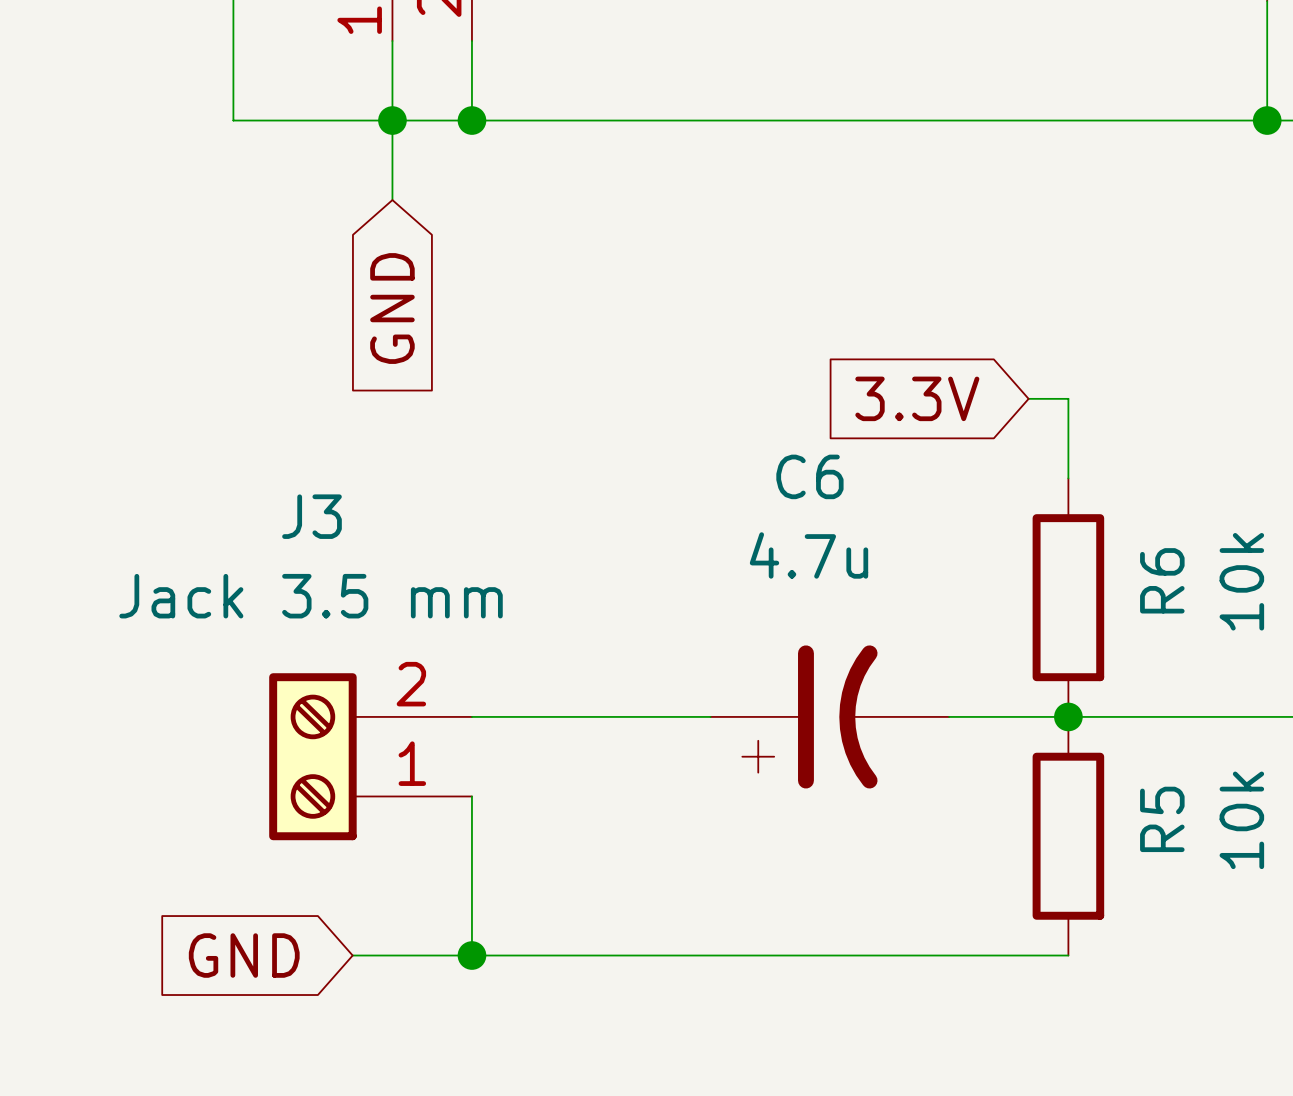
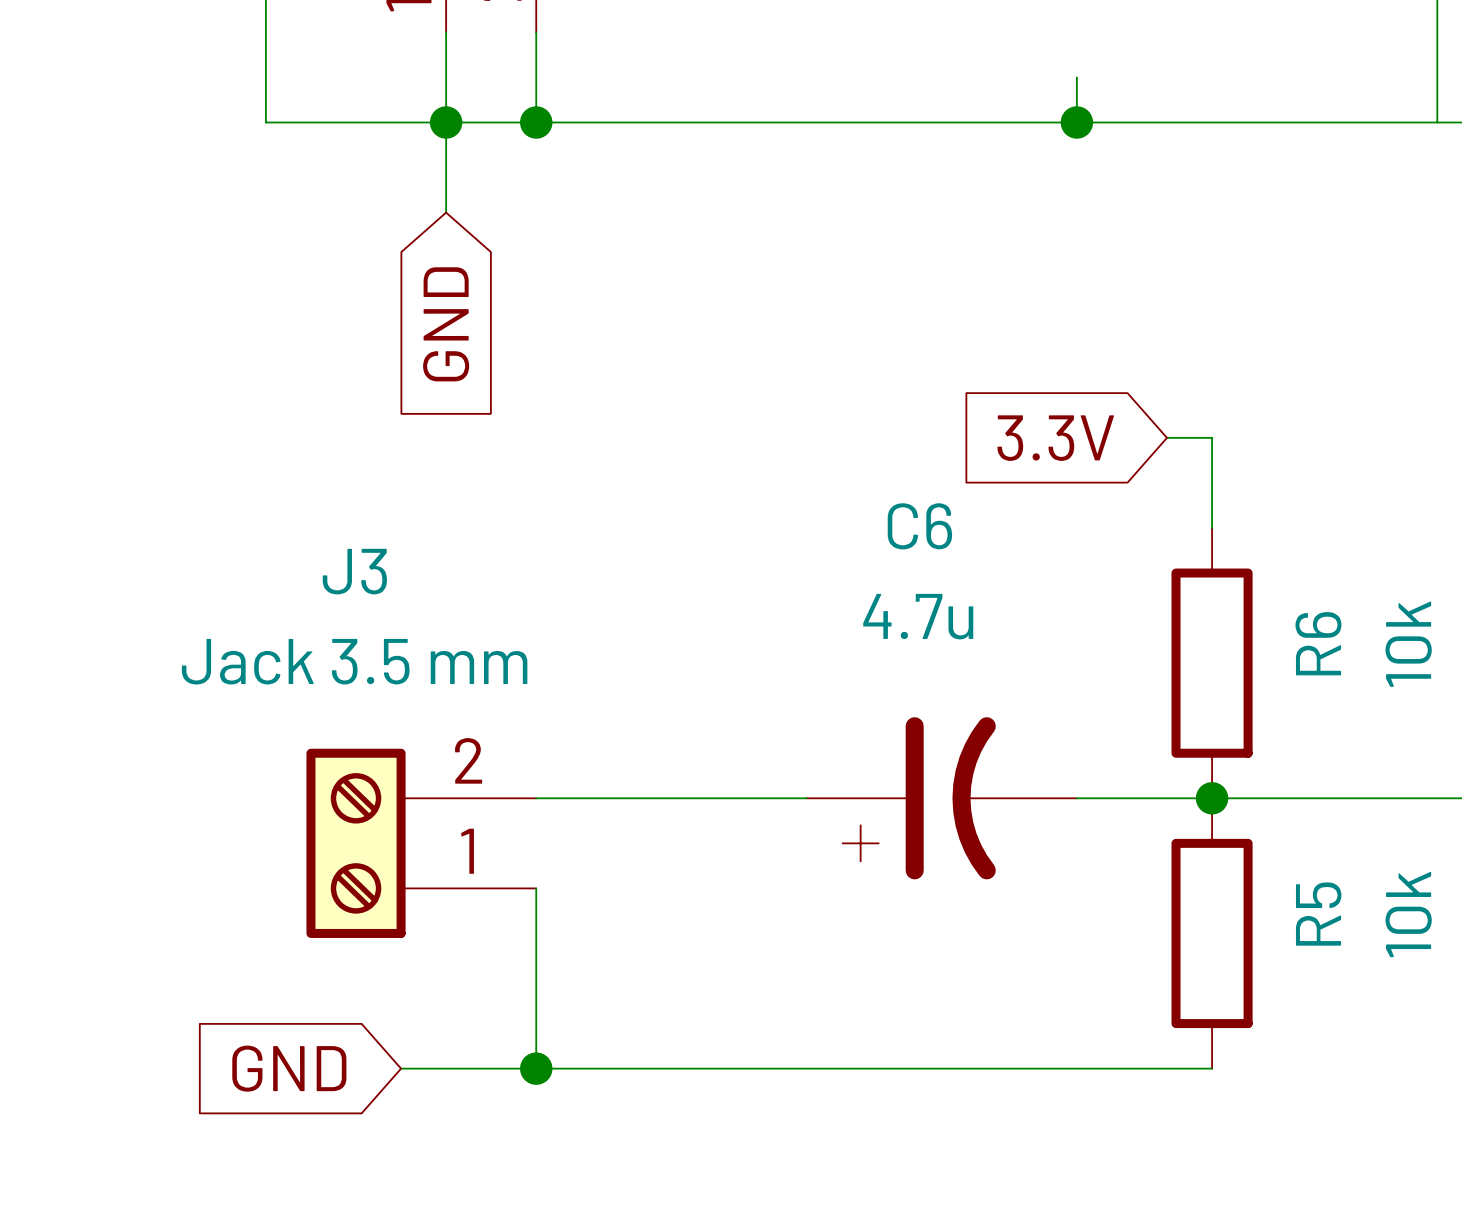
wire: none -> (1076, 77) (1076, 122)
junction: none -> (1076, 122)
junction: (1267, 120) -> none

